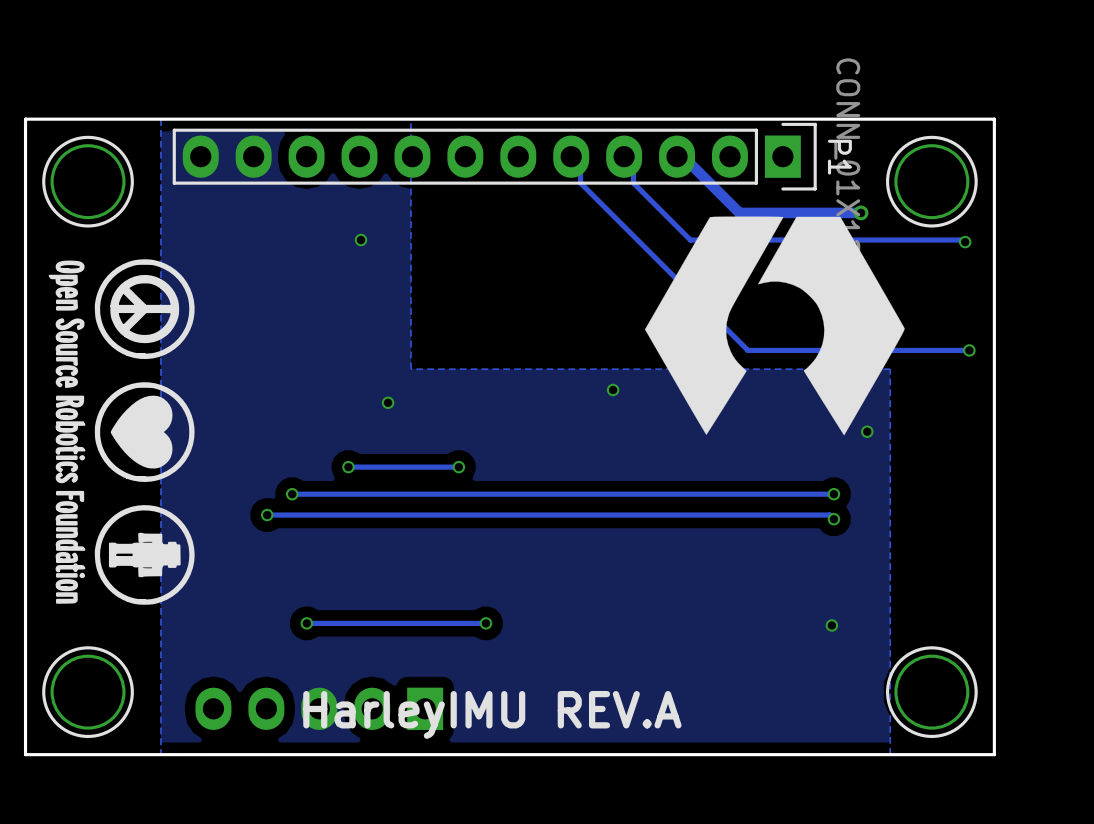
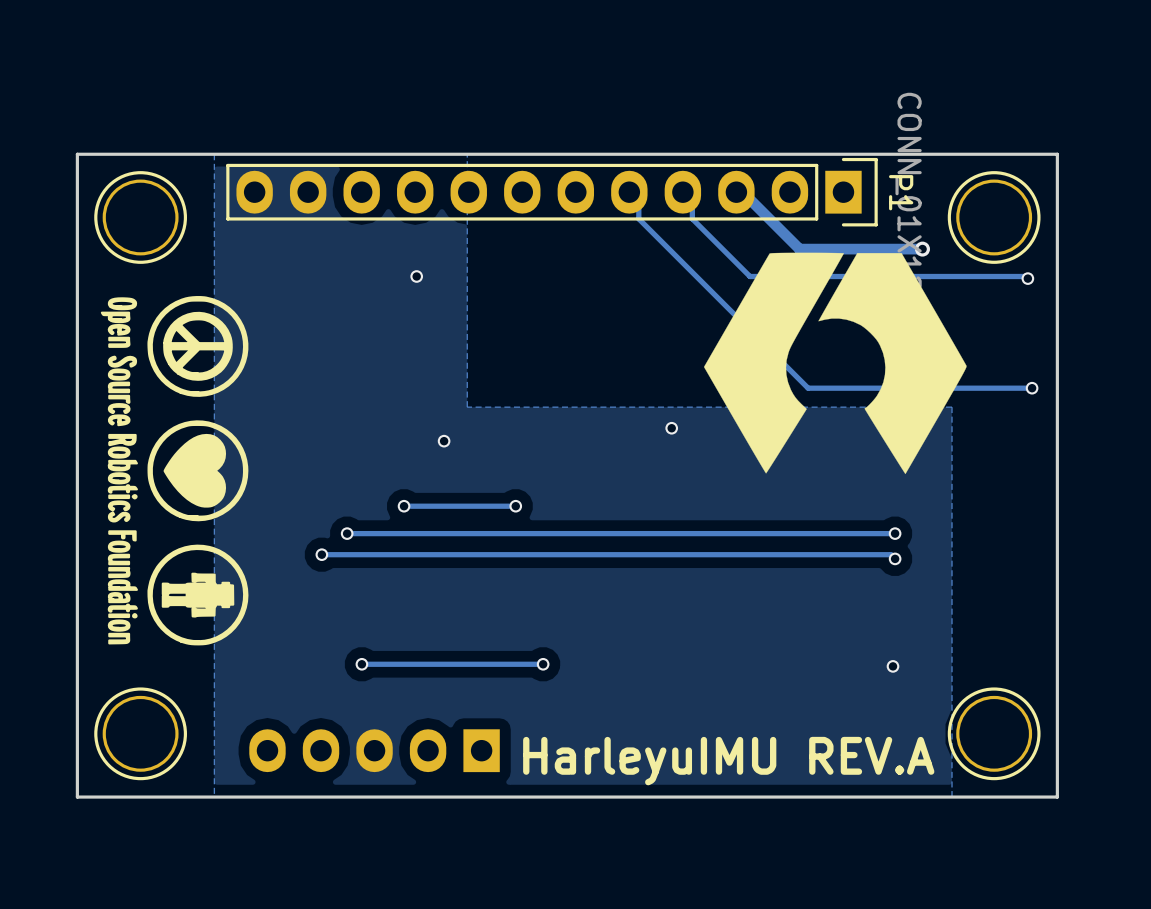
via: (867, 431) -> none
text: HarleyIMU REV.A (492, 714) -> HarleyuIMU REV.A (728, 761)

